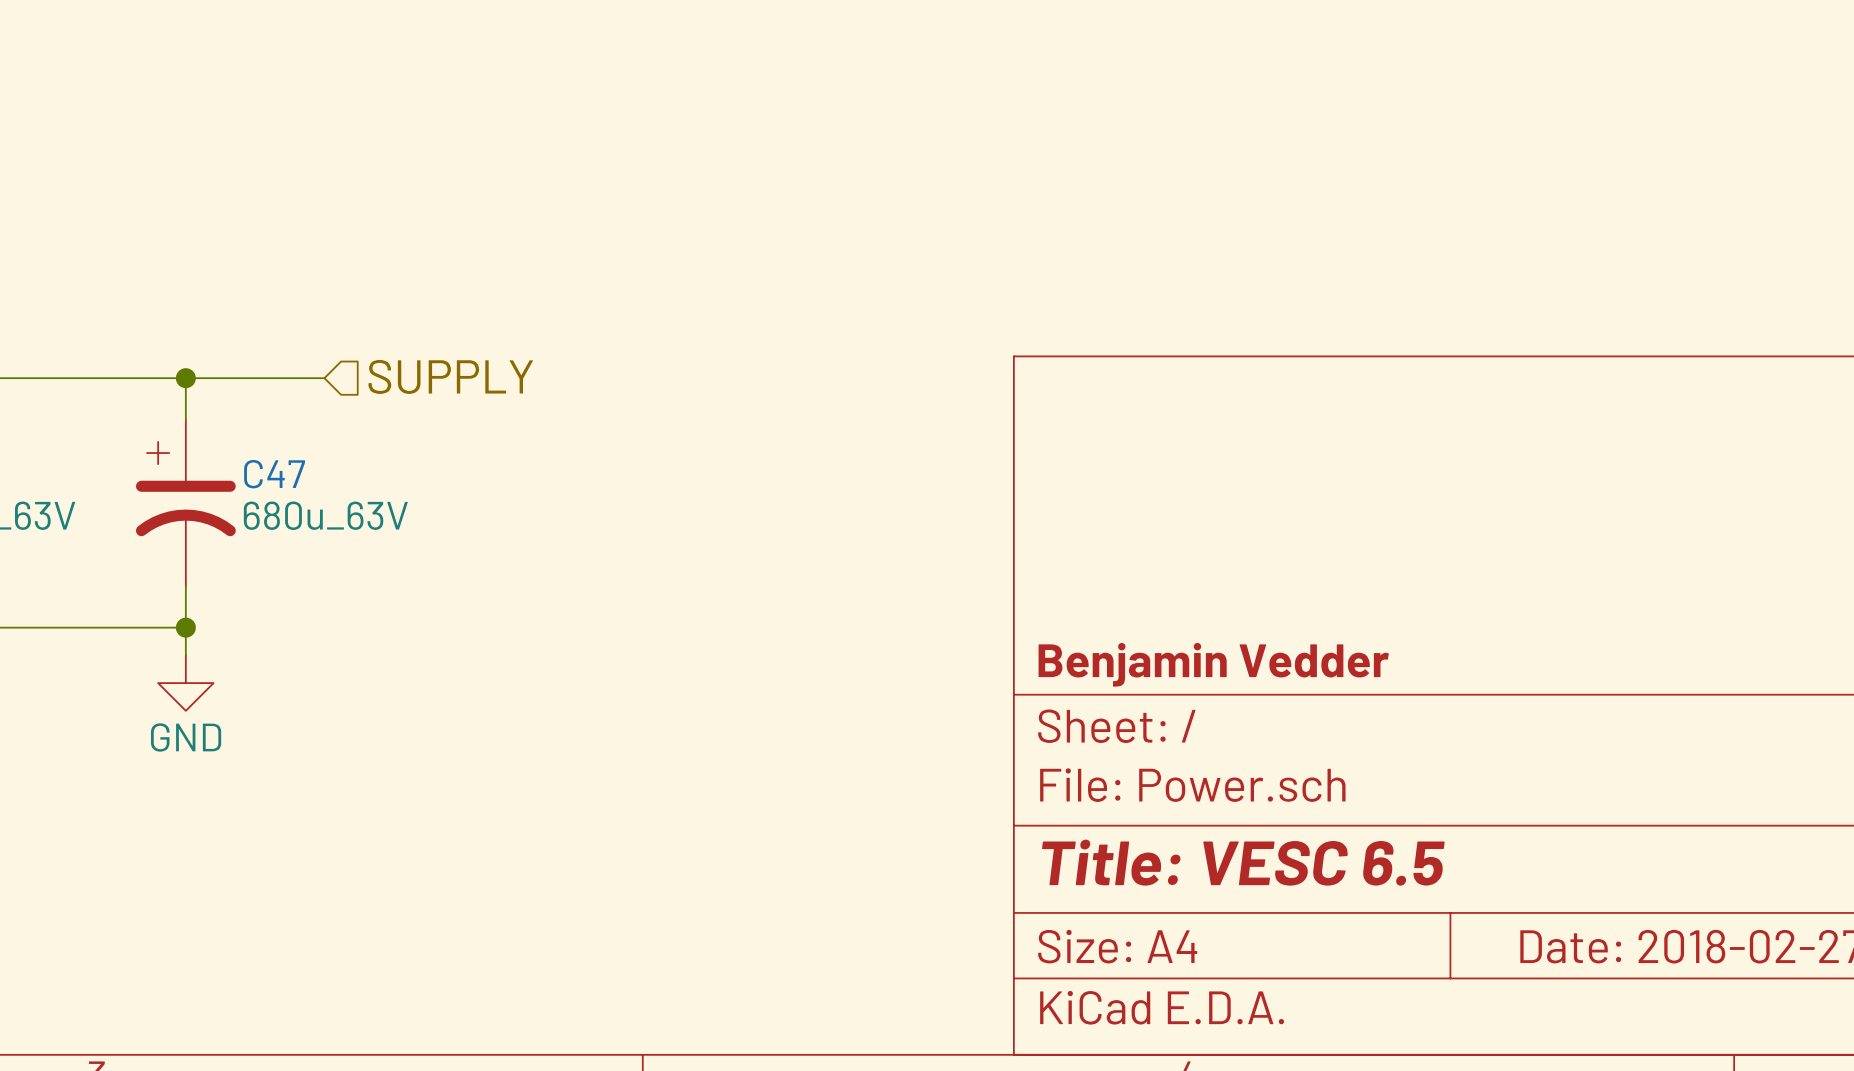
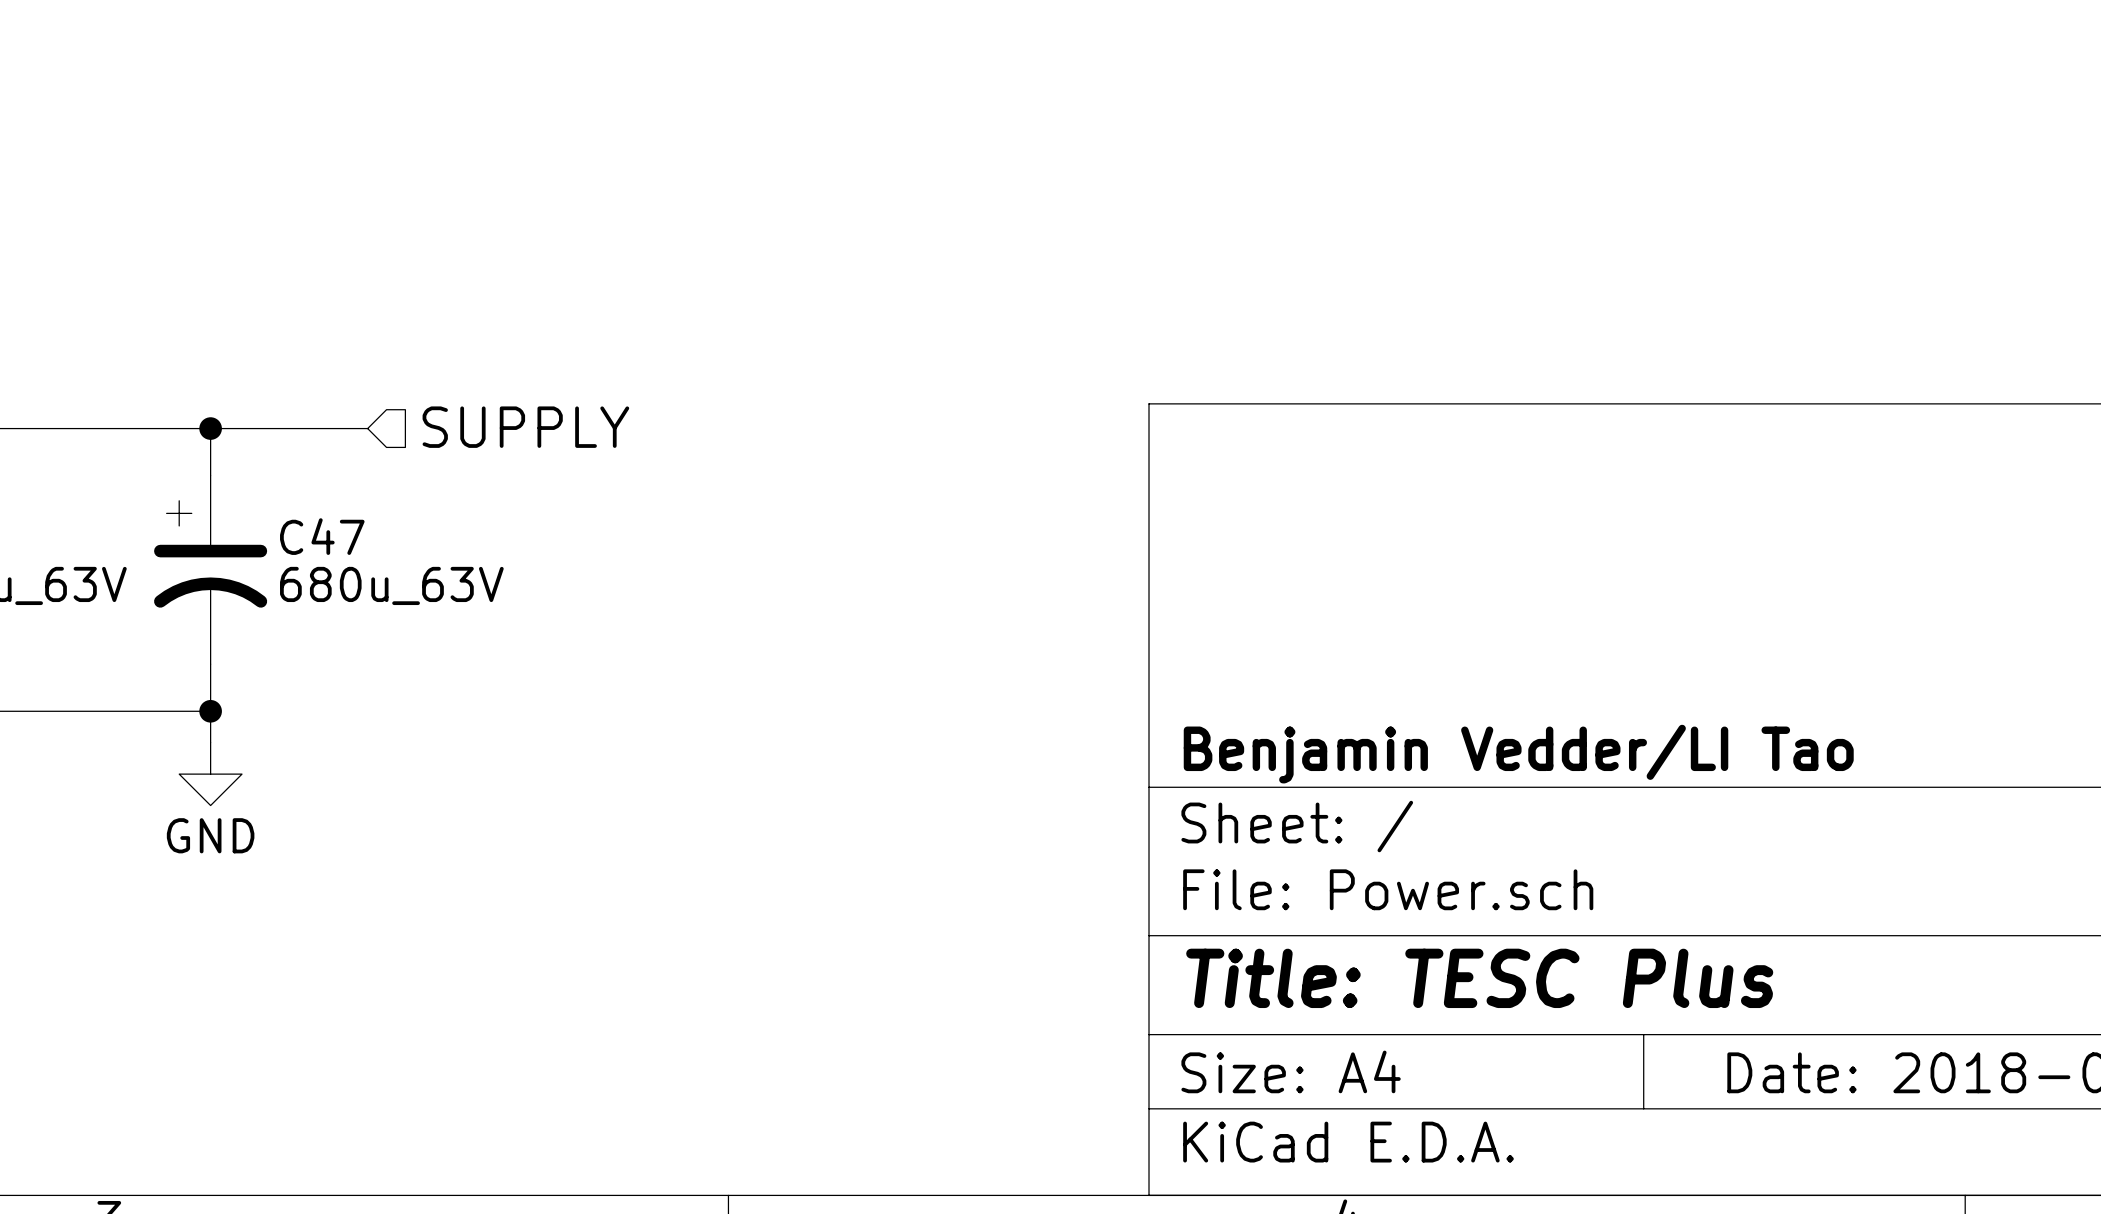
title block: Benjamin Vedder (1213, 664) -> Benjamin Vedder/LI Tao (1518, 754)
title block: Title: VESC 6.5 (1243, 862) -> Title: TESC Plus (1479, 978)

